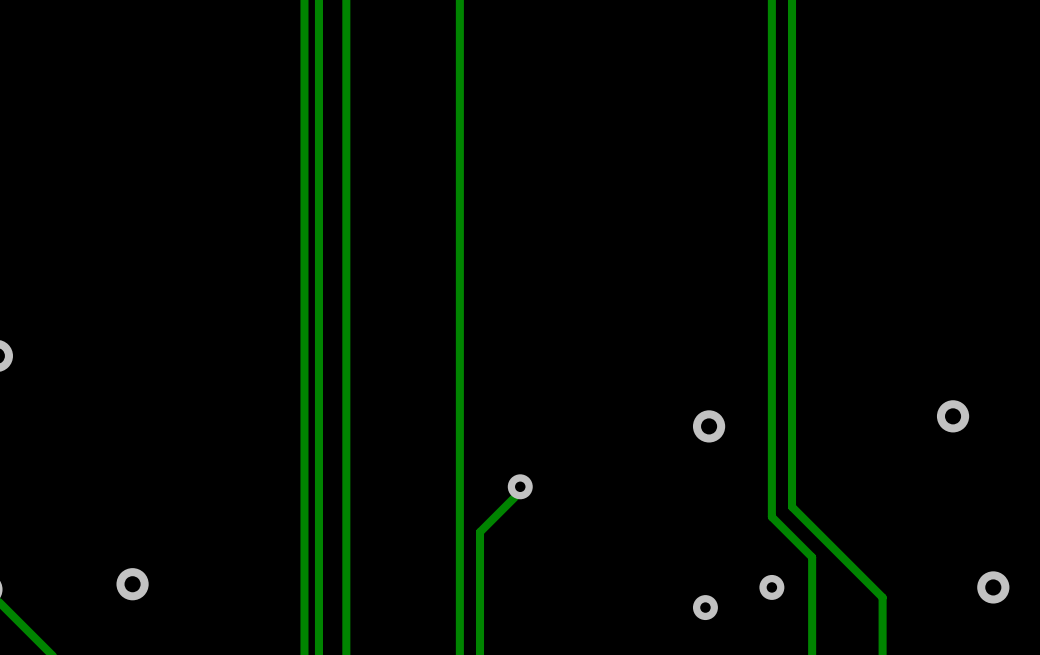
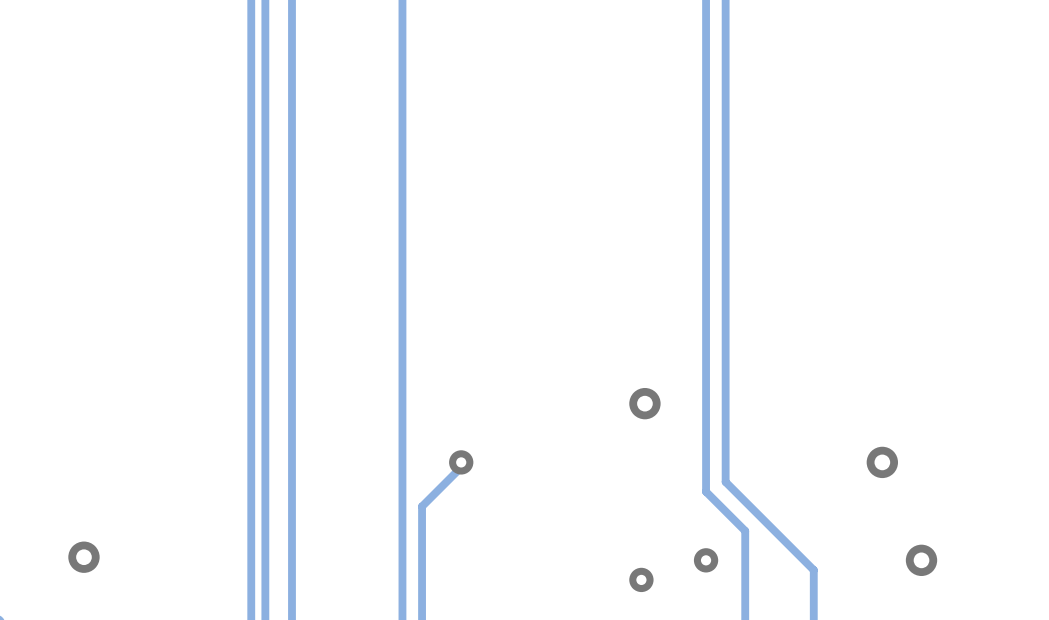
via position: (953, 416) -> (882, 462)

